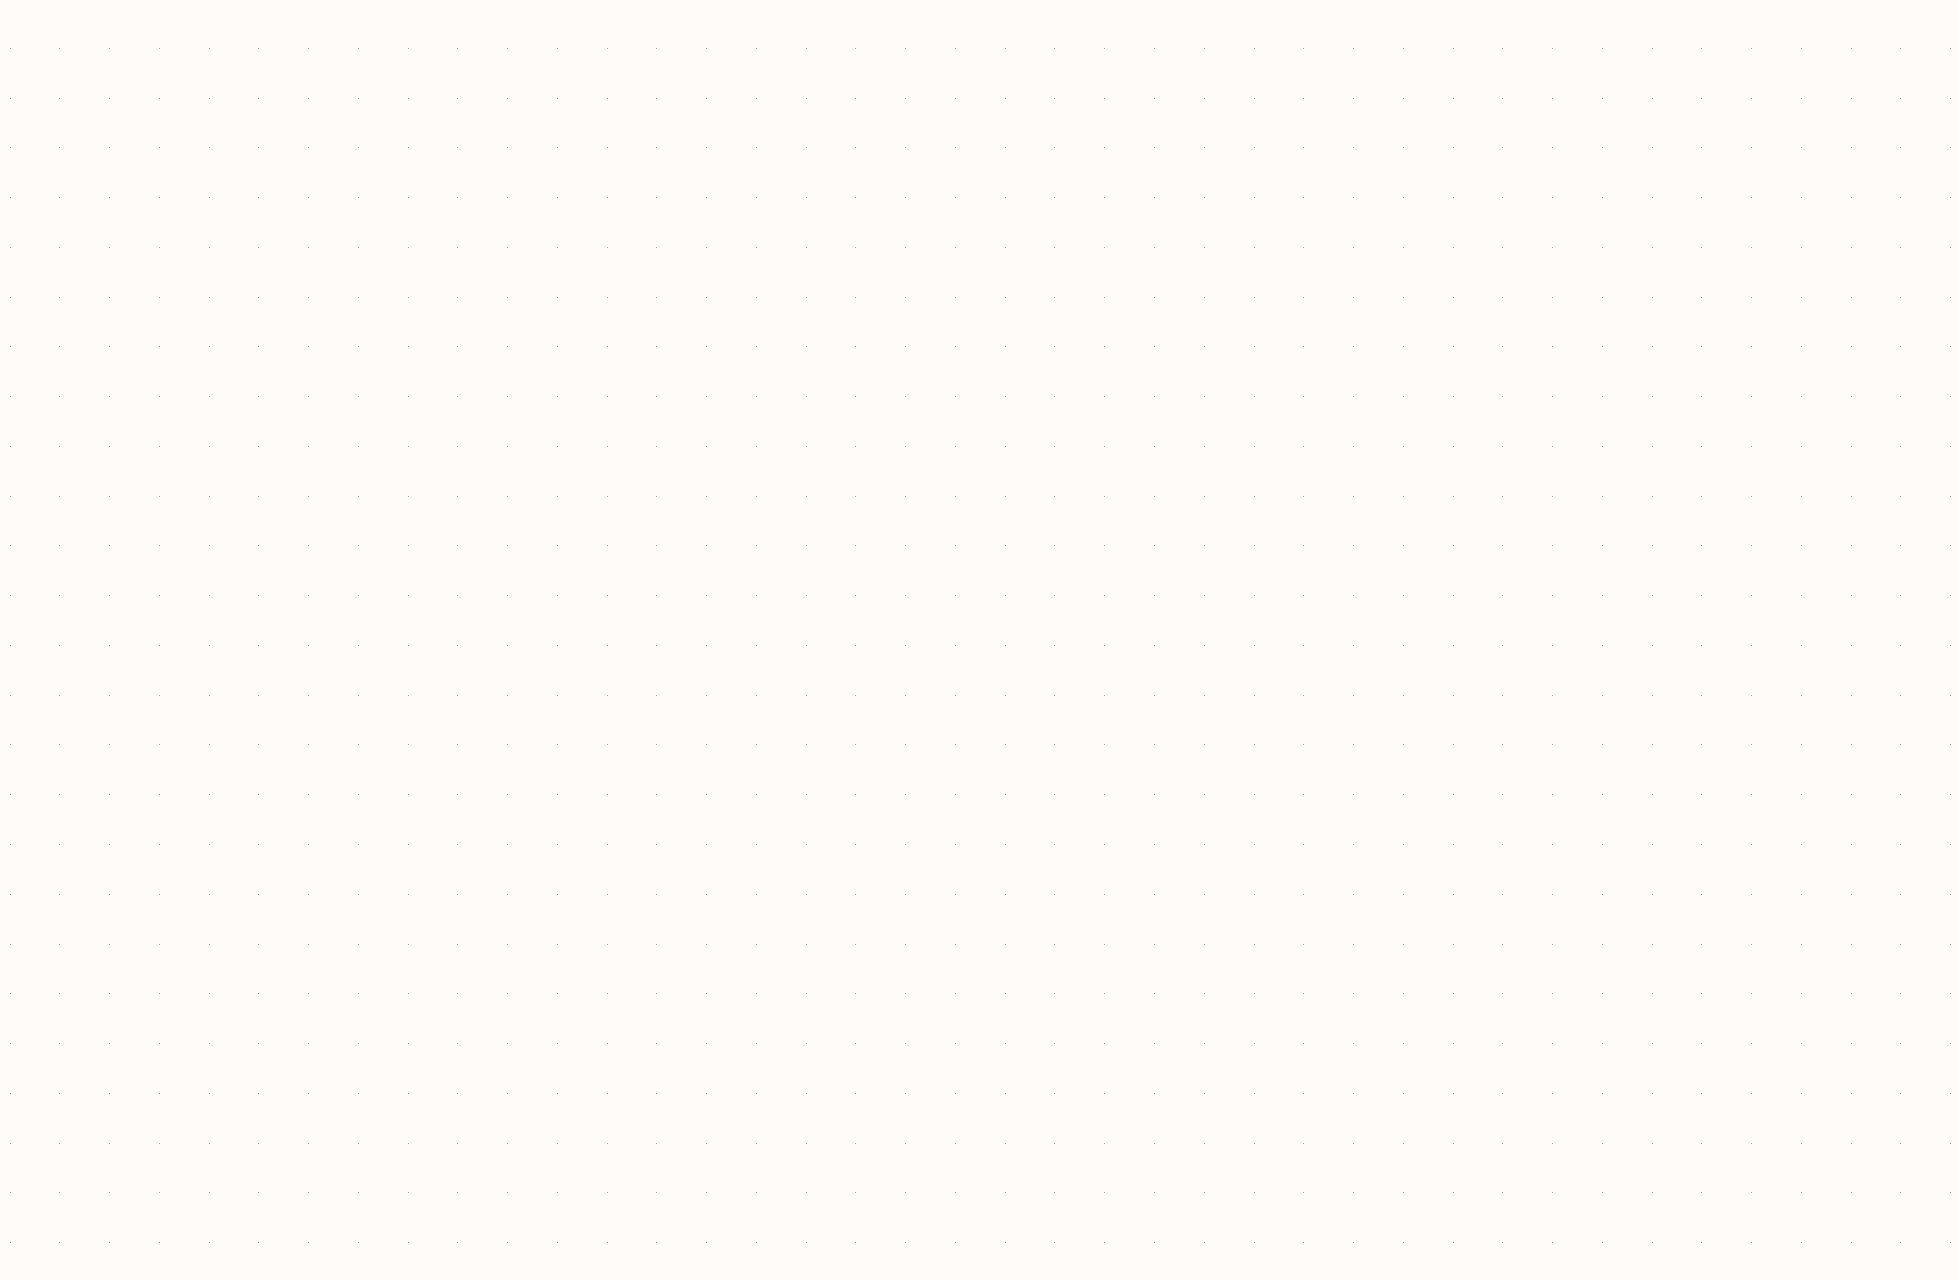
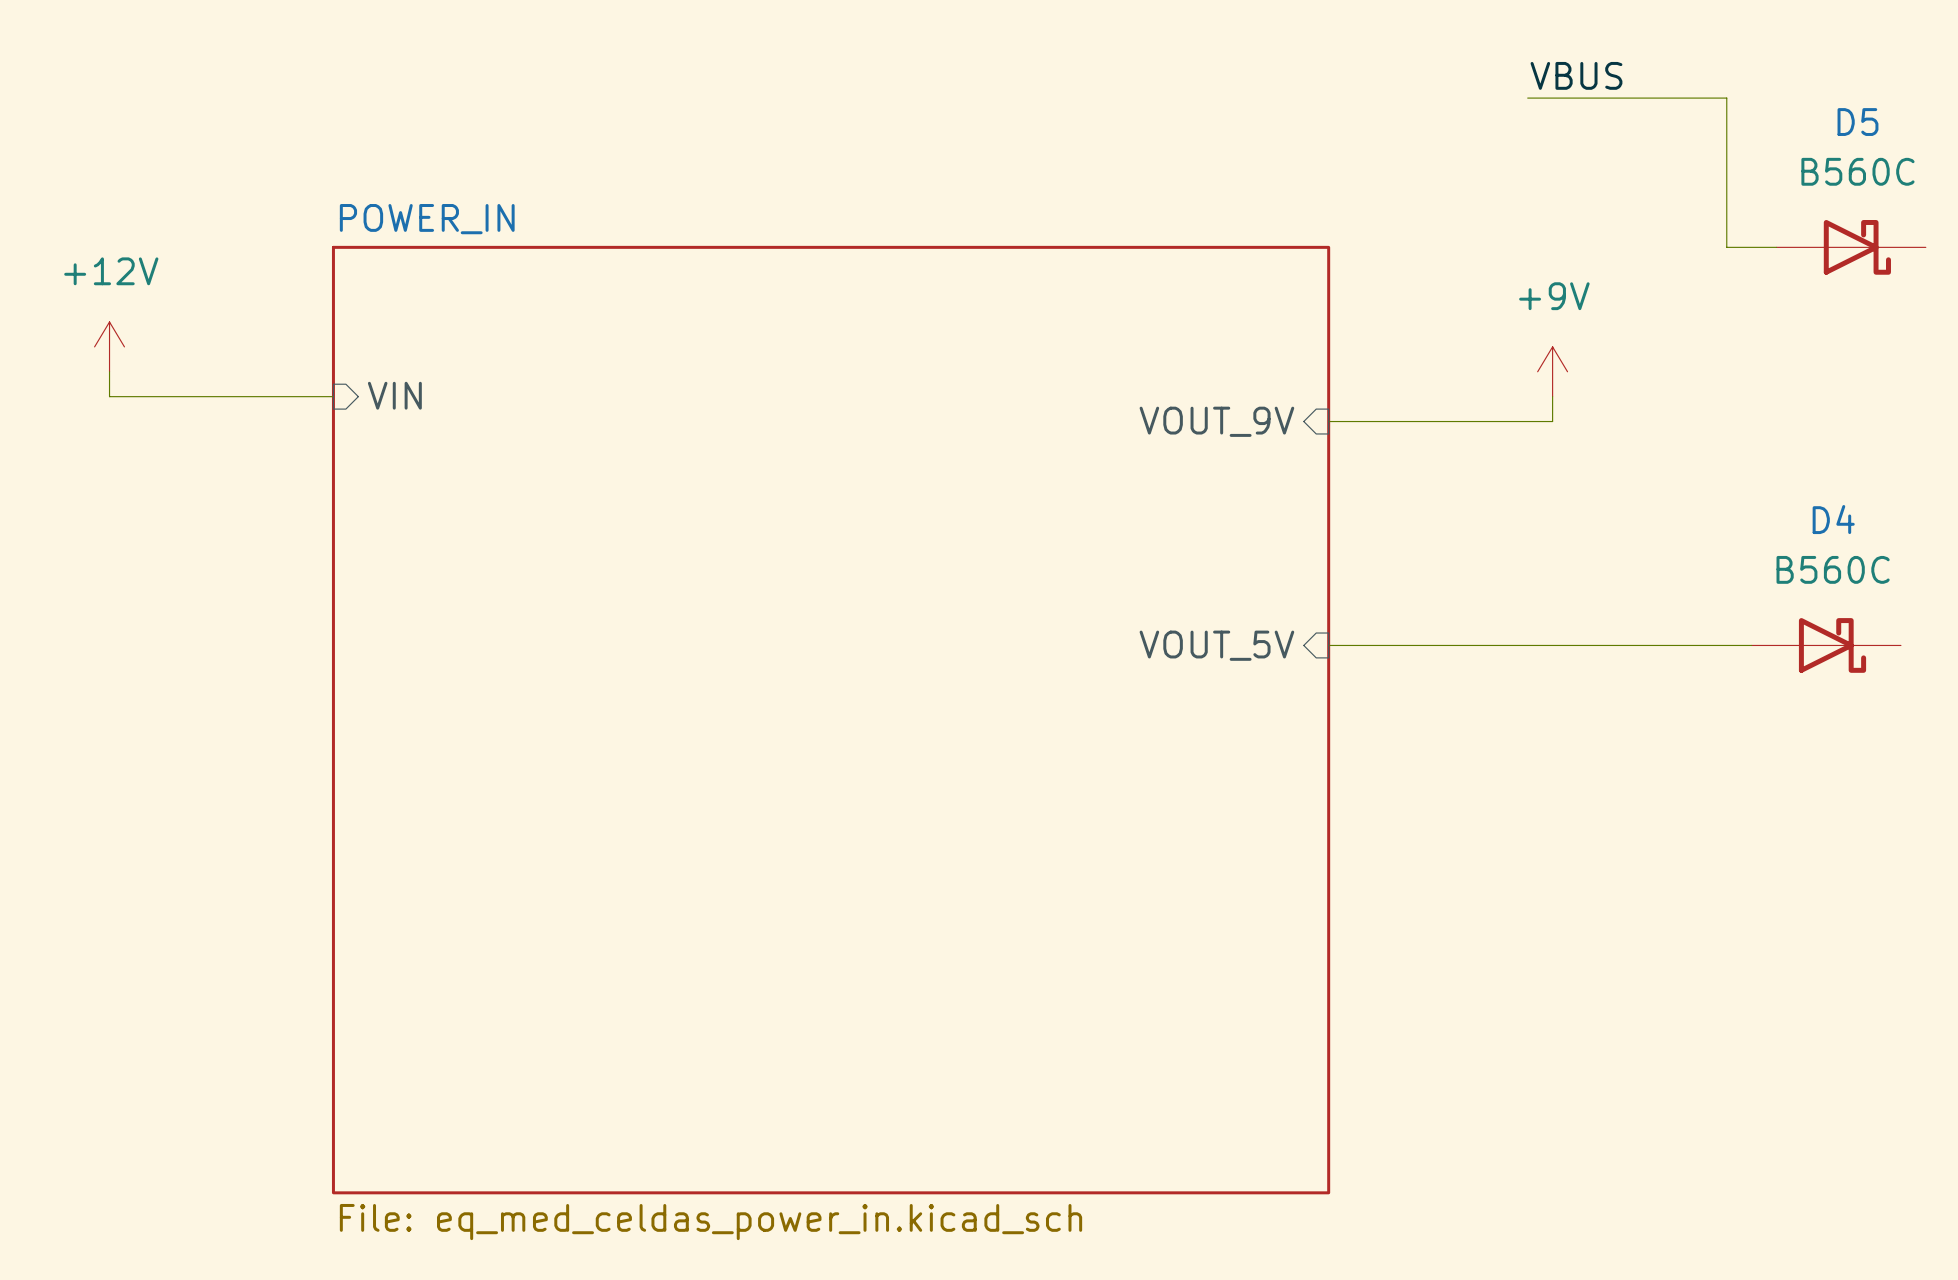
label: none -> VBUS (1576, 75)
wire: none -> (1527, 98) (1726, 98) (1726, 247) (1776, 247)
D5: none -> B560C (1851, 247)
power symbol: none -> +12V (109, 346)
wire: none -> (109, 371) (109, 396) (333, 396)
power symbol: none -> +9V (1552, 371)
sheet pin: none -> VIN (394, 395)
wire: none -> (1552, 396) (1552, 421) (1328, 421)
sheet pin: none -> VOUT_9V (1216, 421)
wire: none -> (1328, 645) (1751, 645)
D4: none -> B560C (1826, 645)
sheet pin: none -> VOUT_5V (1216, 645)
sheet POWER_IN: none -> File: eq_med_celdas_power_in.kicad_sch (831, 720)

